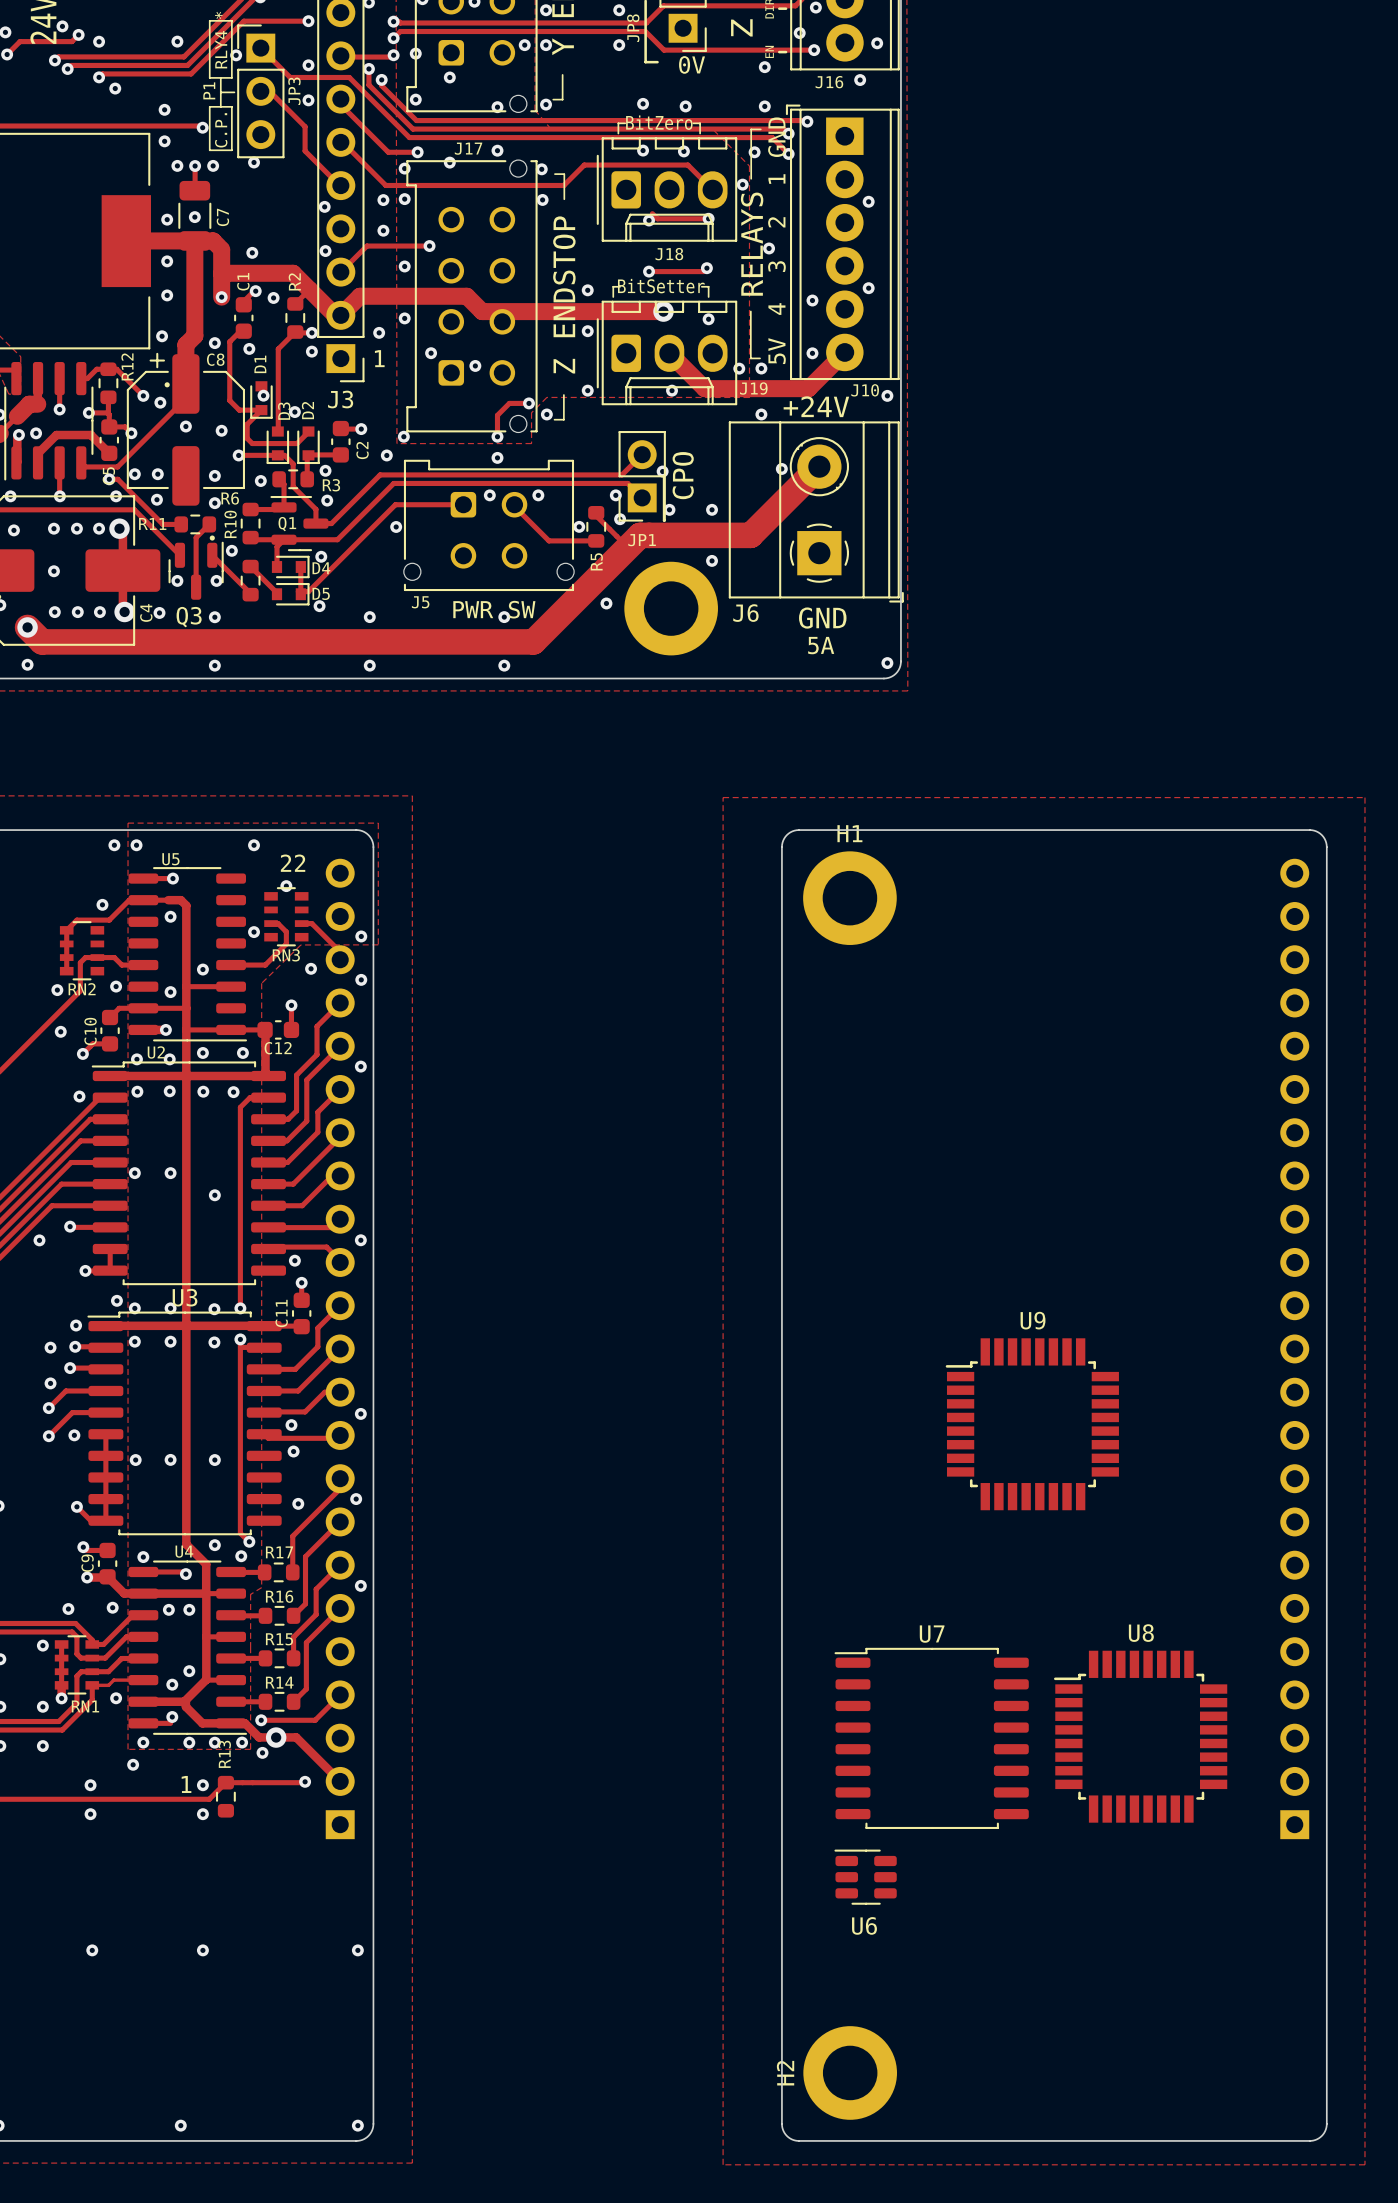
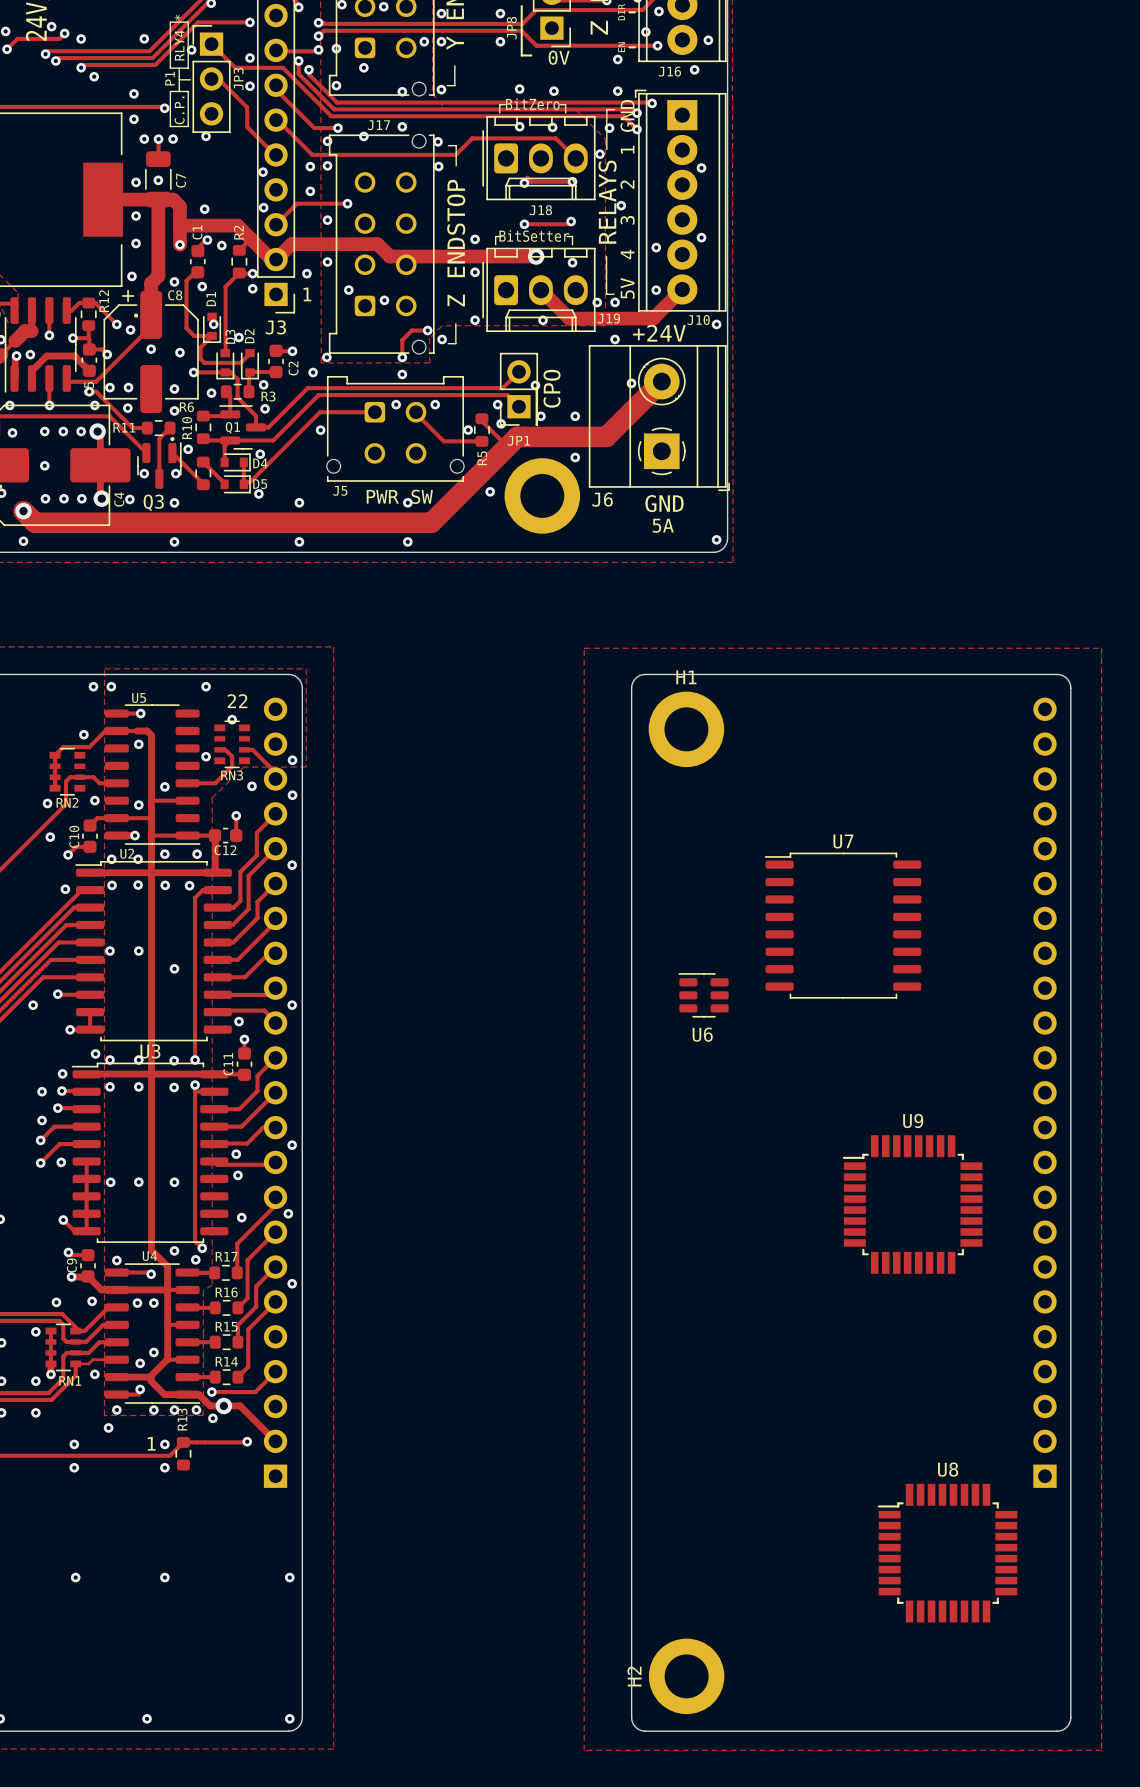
U9 position: (1032, 1424) -> (912, 1204)
U8 position: (1140, 1736) -> (947, 1553)
U7 position: (931, 1738) -> (843, 925)
U6 position: (865, 1877) -> (703, 995)

